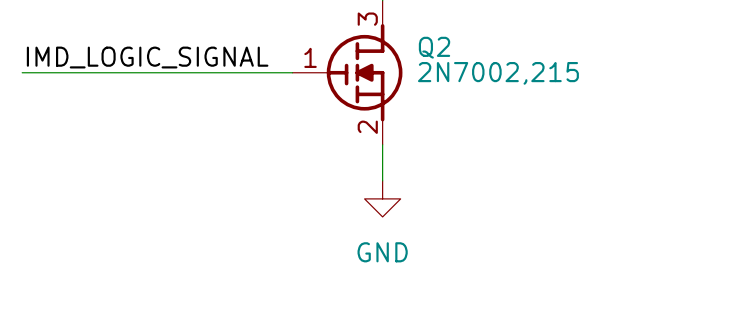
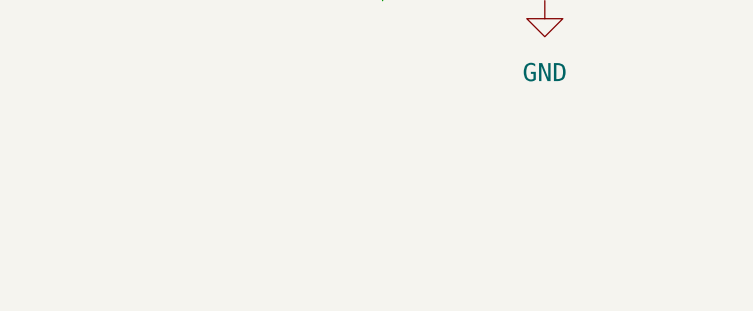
power symbol: none -> GND (544, 18)
label: IMD_LOGIC_SIGNAL (147, 57) -> none
wire: (22, 72) (292, 72) -> none
Q2: 2N7002,215 (347, 72) -> none
wire: (382, 144) (382, 180) -> none
power symbol: GND (382, 198) -> none

